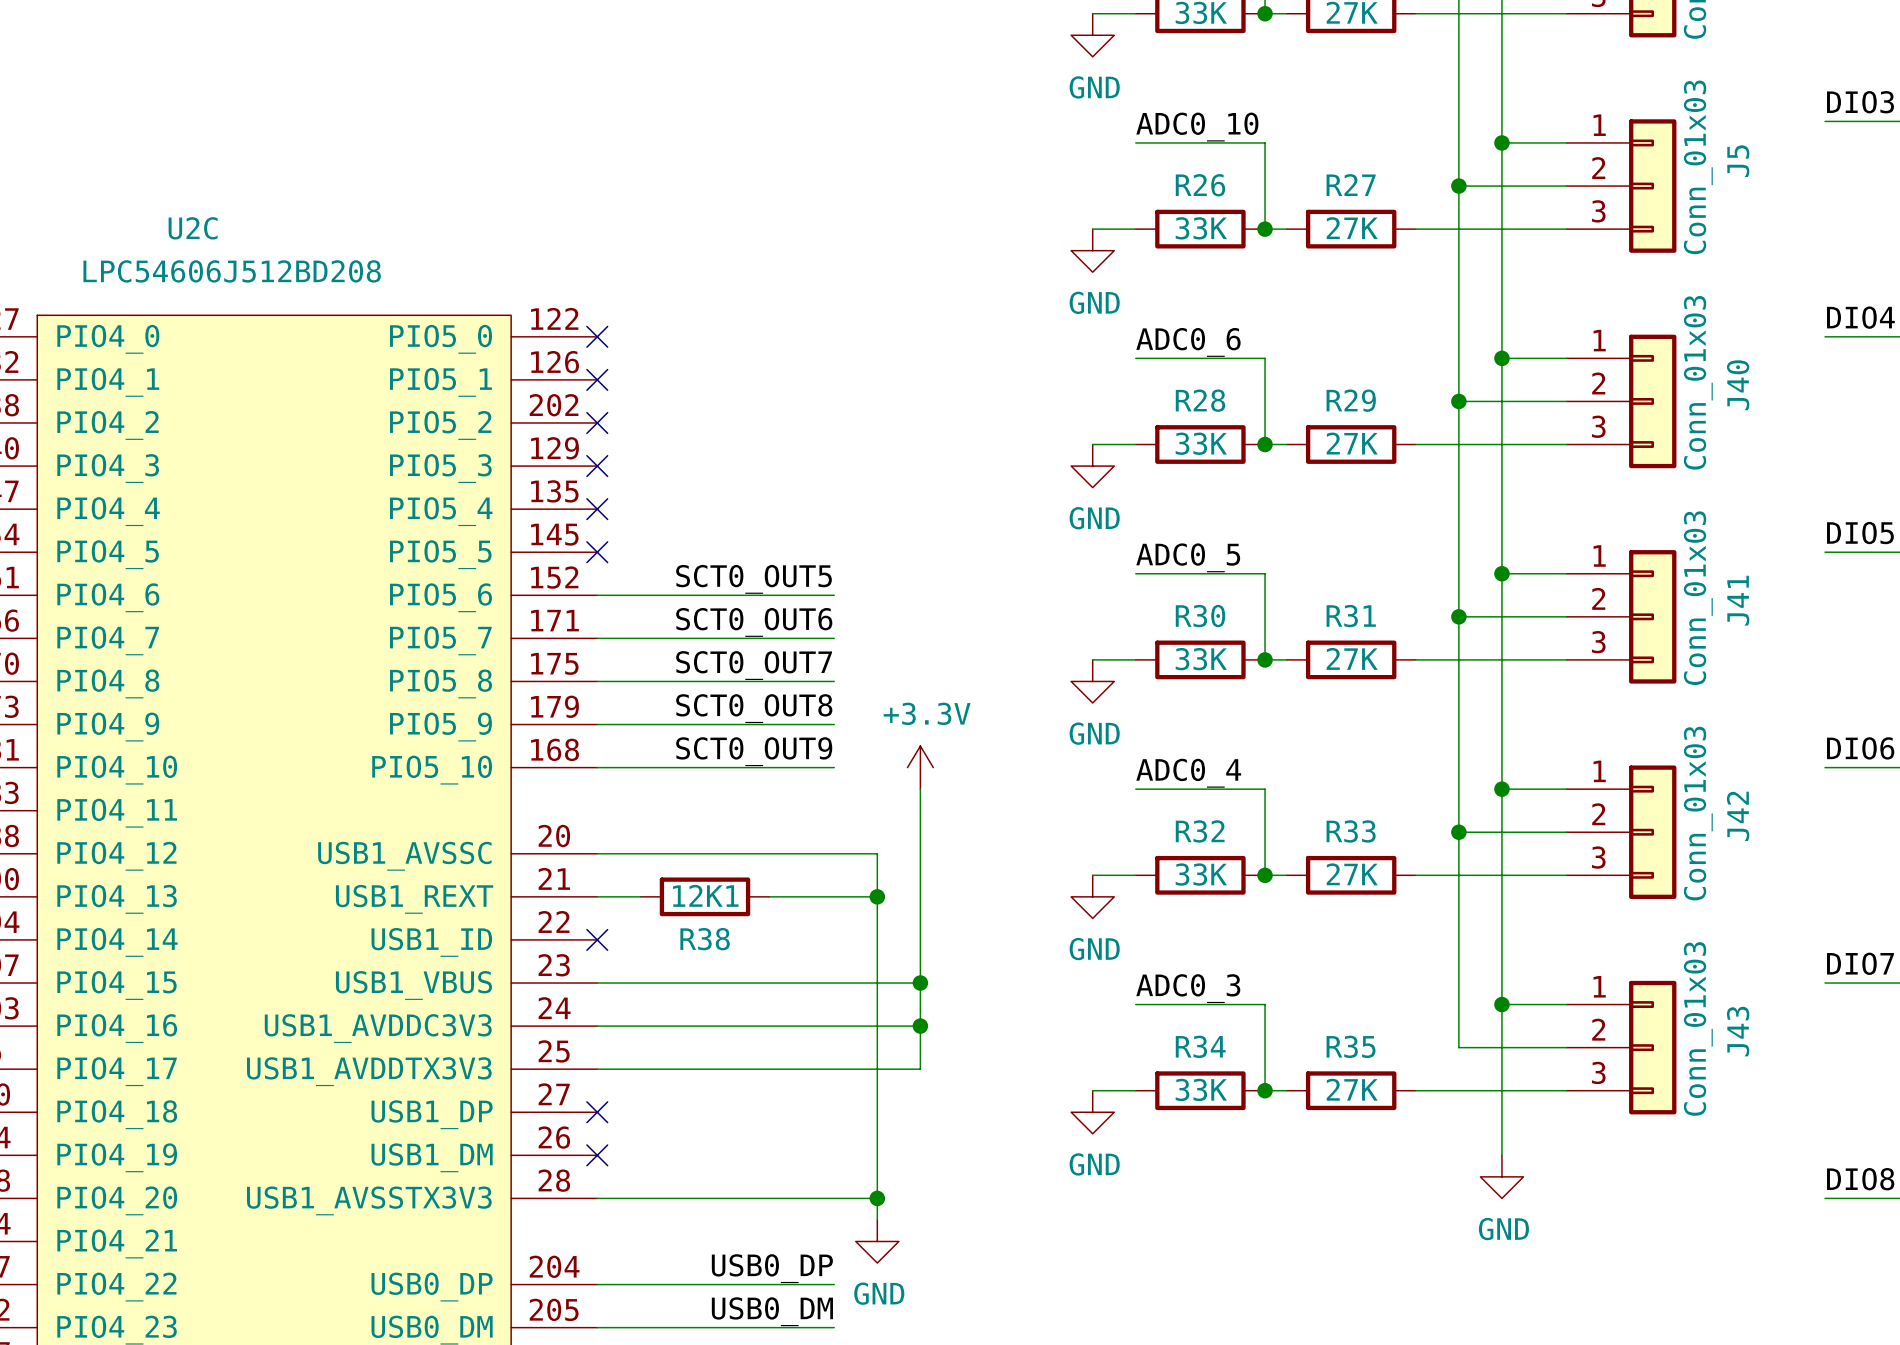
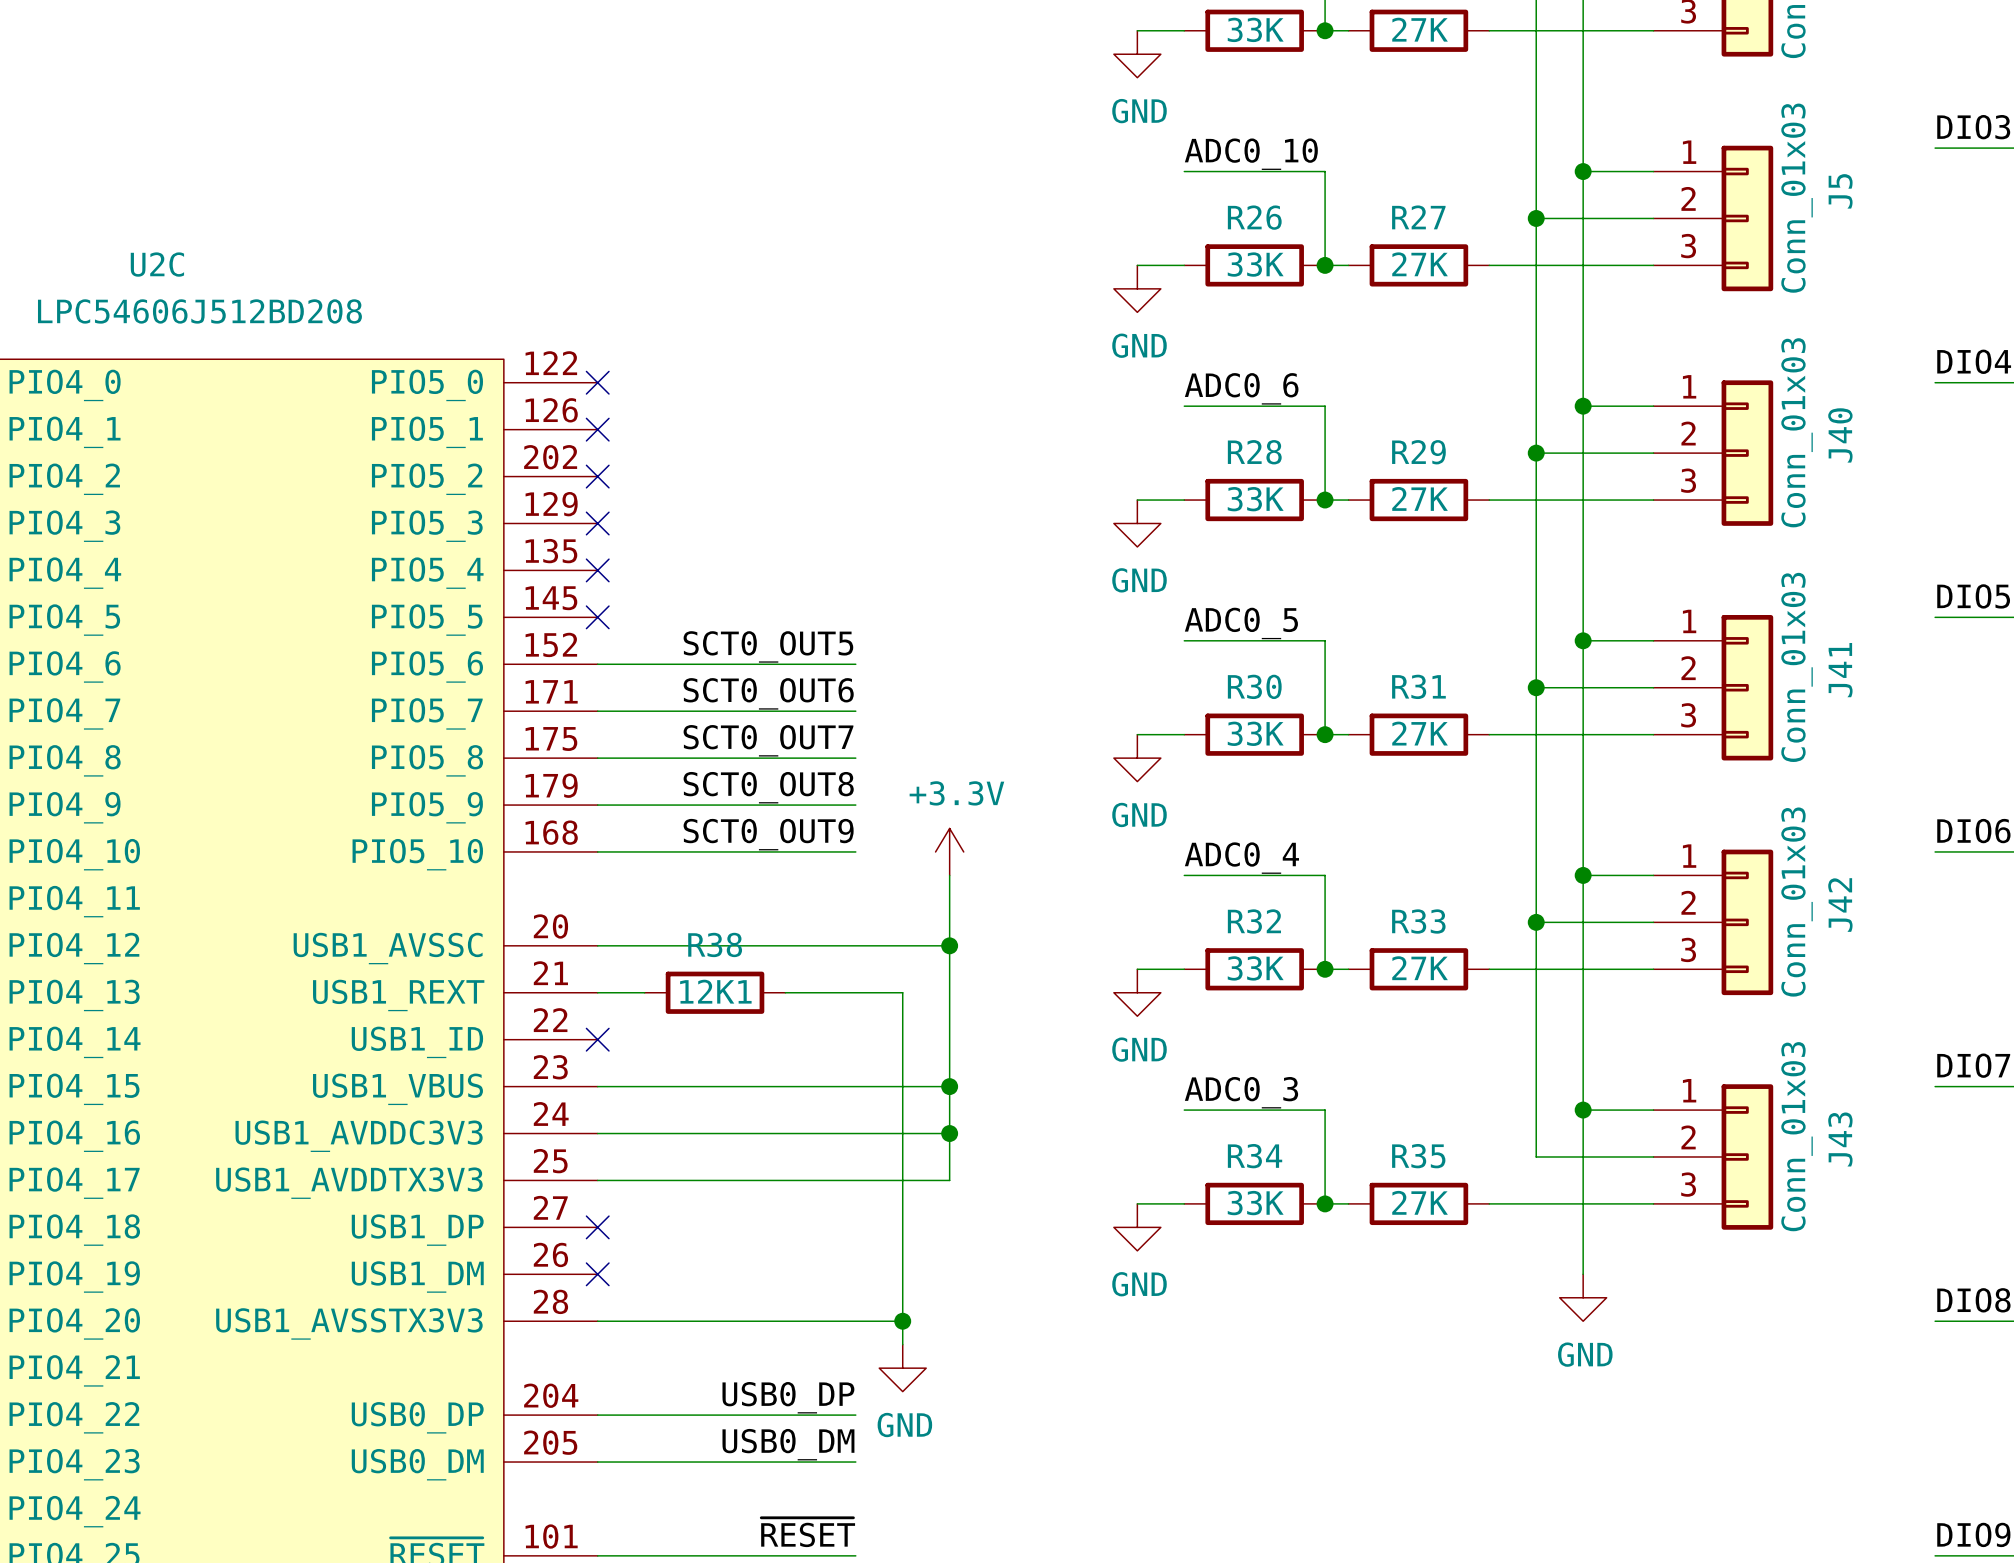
wire: (877, 853) (877, 896) -> (902, 945) (949, 945)
junction position: (877, 896) -> (949, 945)
R38 name position: R38 (705, 939) -> R38 (715, 944)

